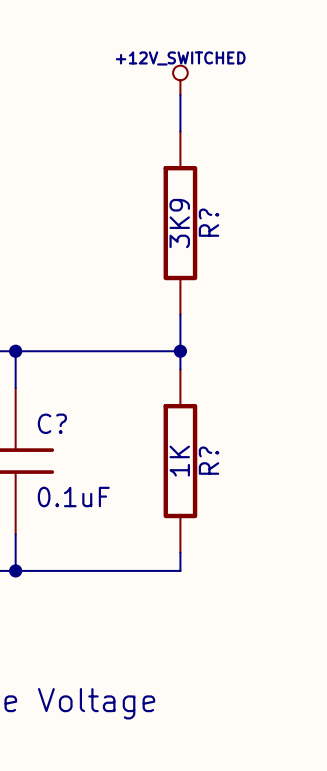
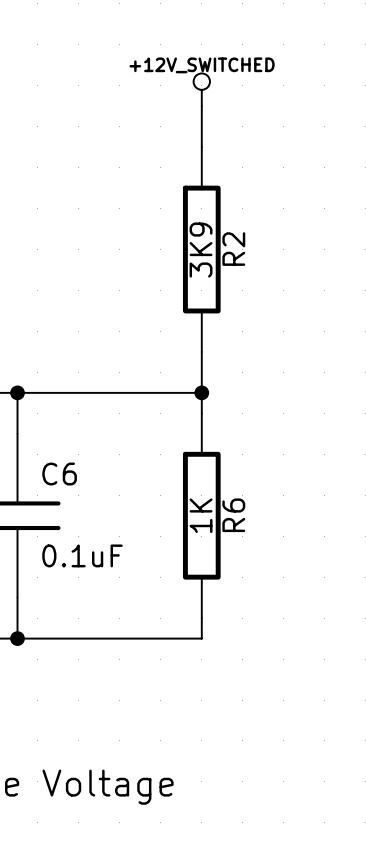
R? name: R? (209, 222) -> R2 (233, 249)
C? name: C? (52, 423) -> C6 (59, 474)
R? name: R? (209, 460) -> R6 (233, 515)

